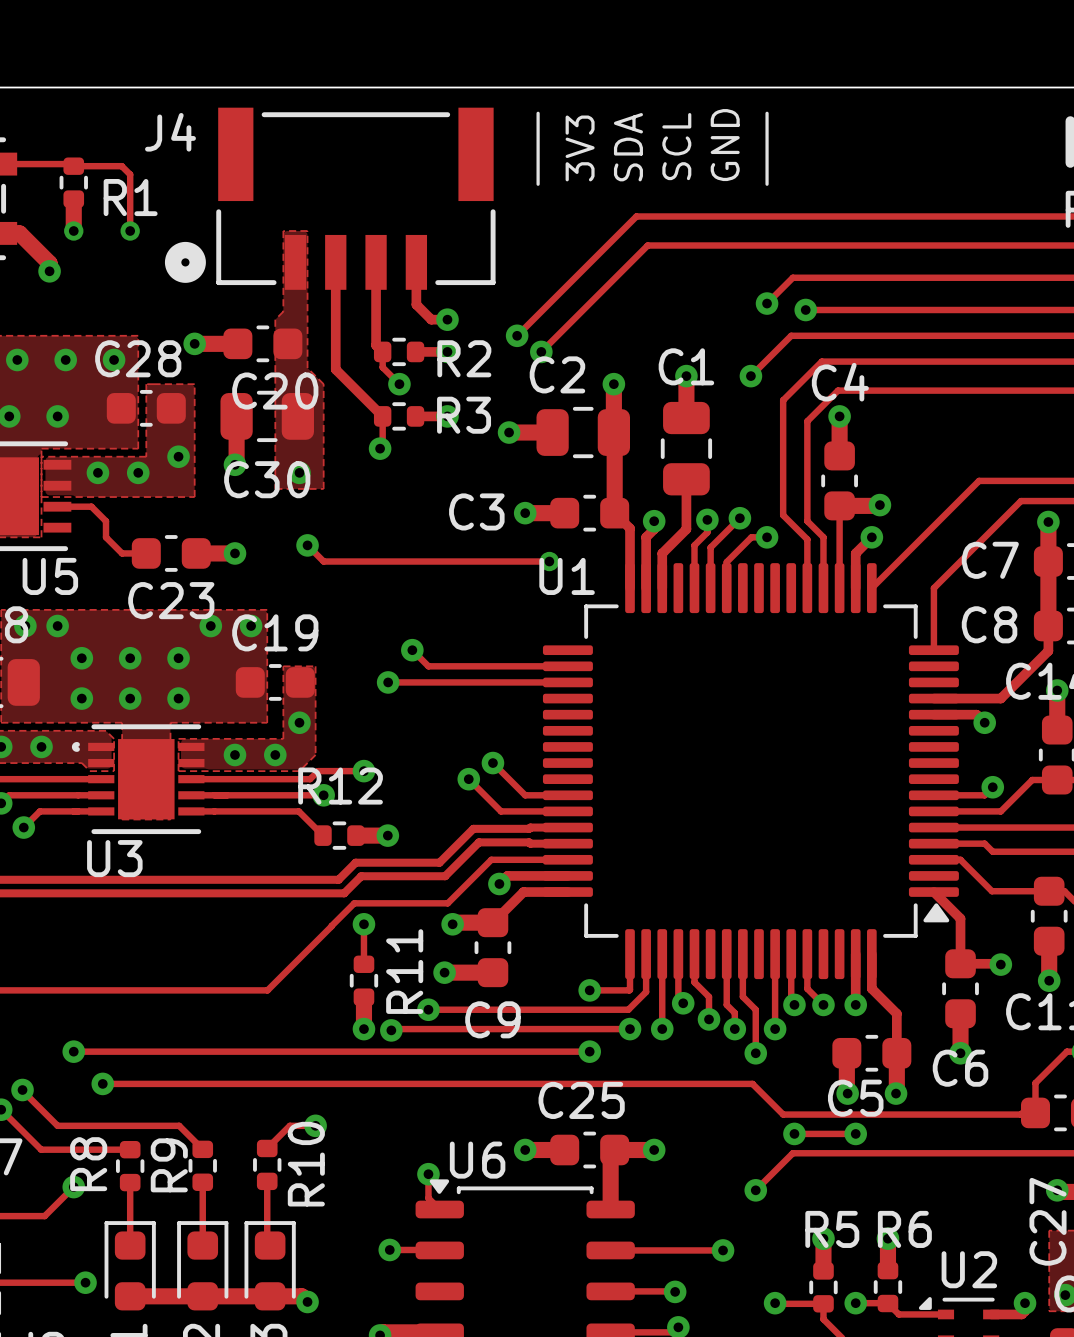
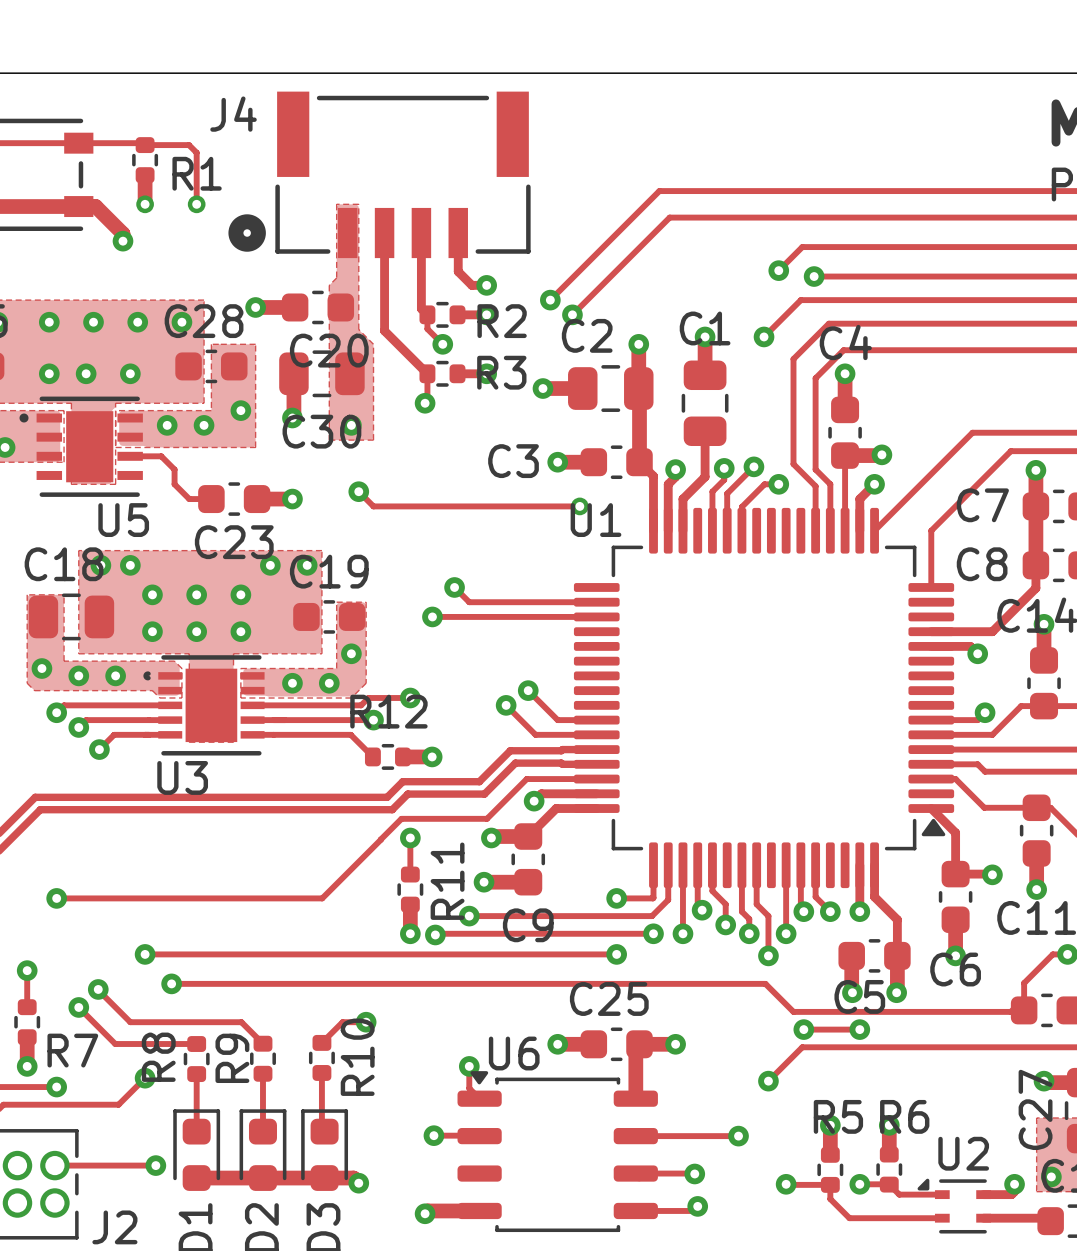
line: (538, 113) (538, 184) -> none
line: (767, 113) (767, 184) -> none
text: GND (725, 145) -> none
text: SCL (676, 146) -> none
text: SDA (628, 147) -> none
text: 3V3 (580, 148) -> none

